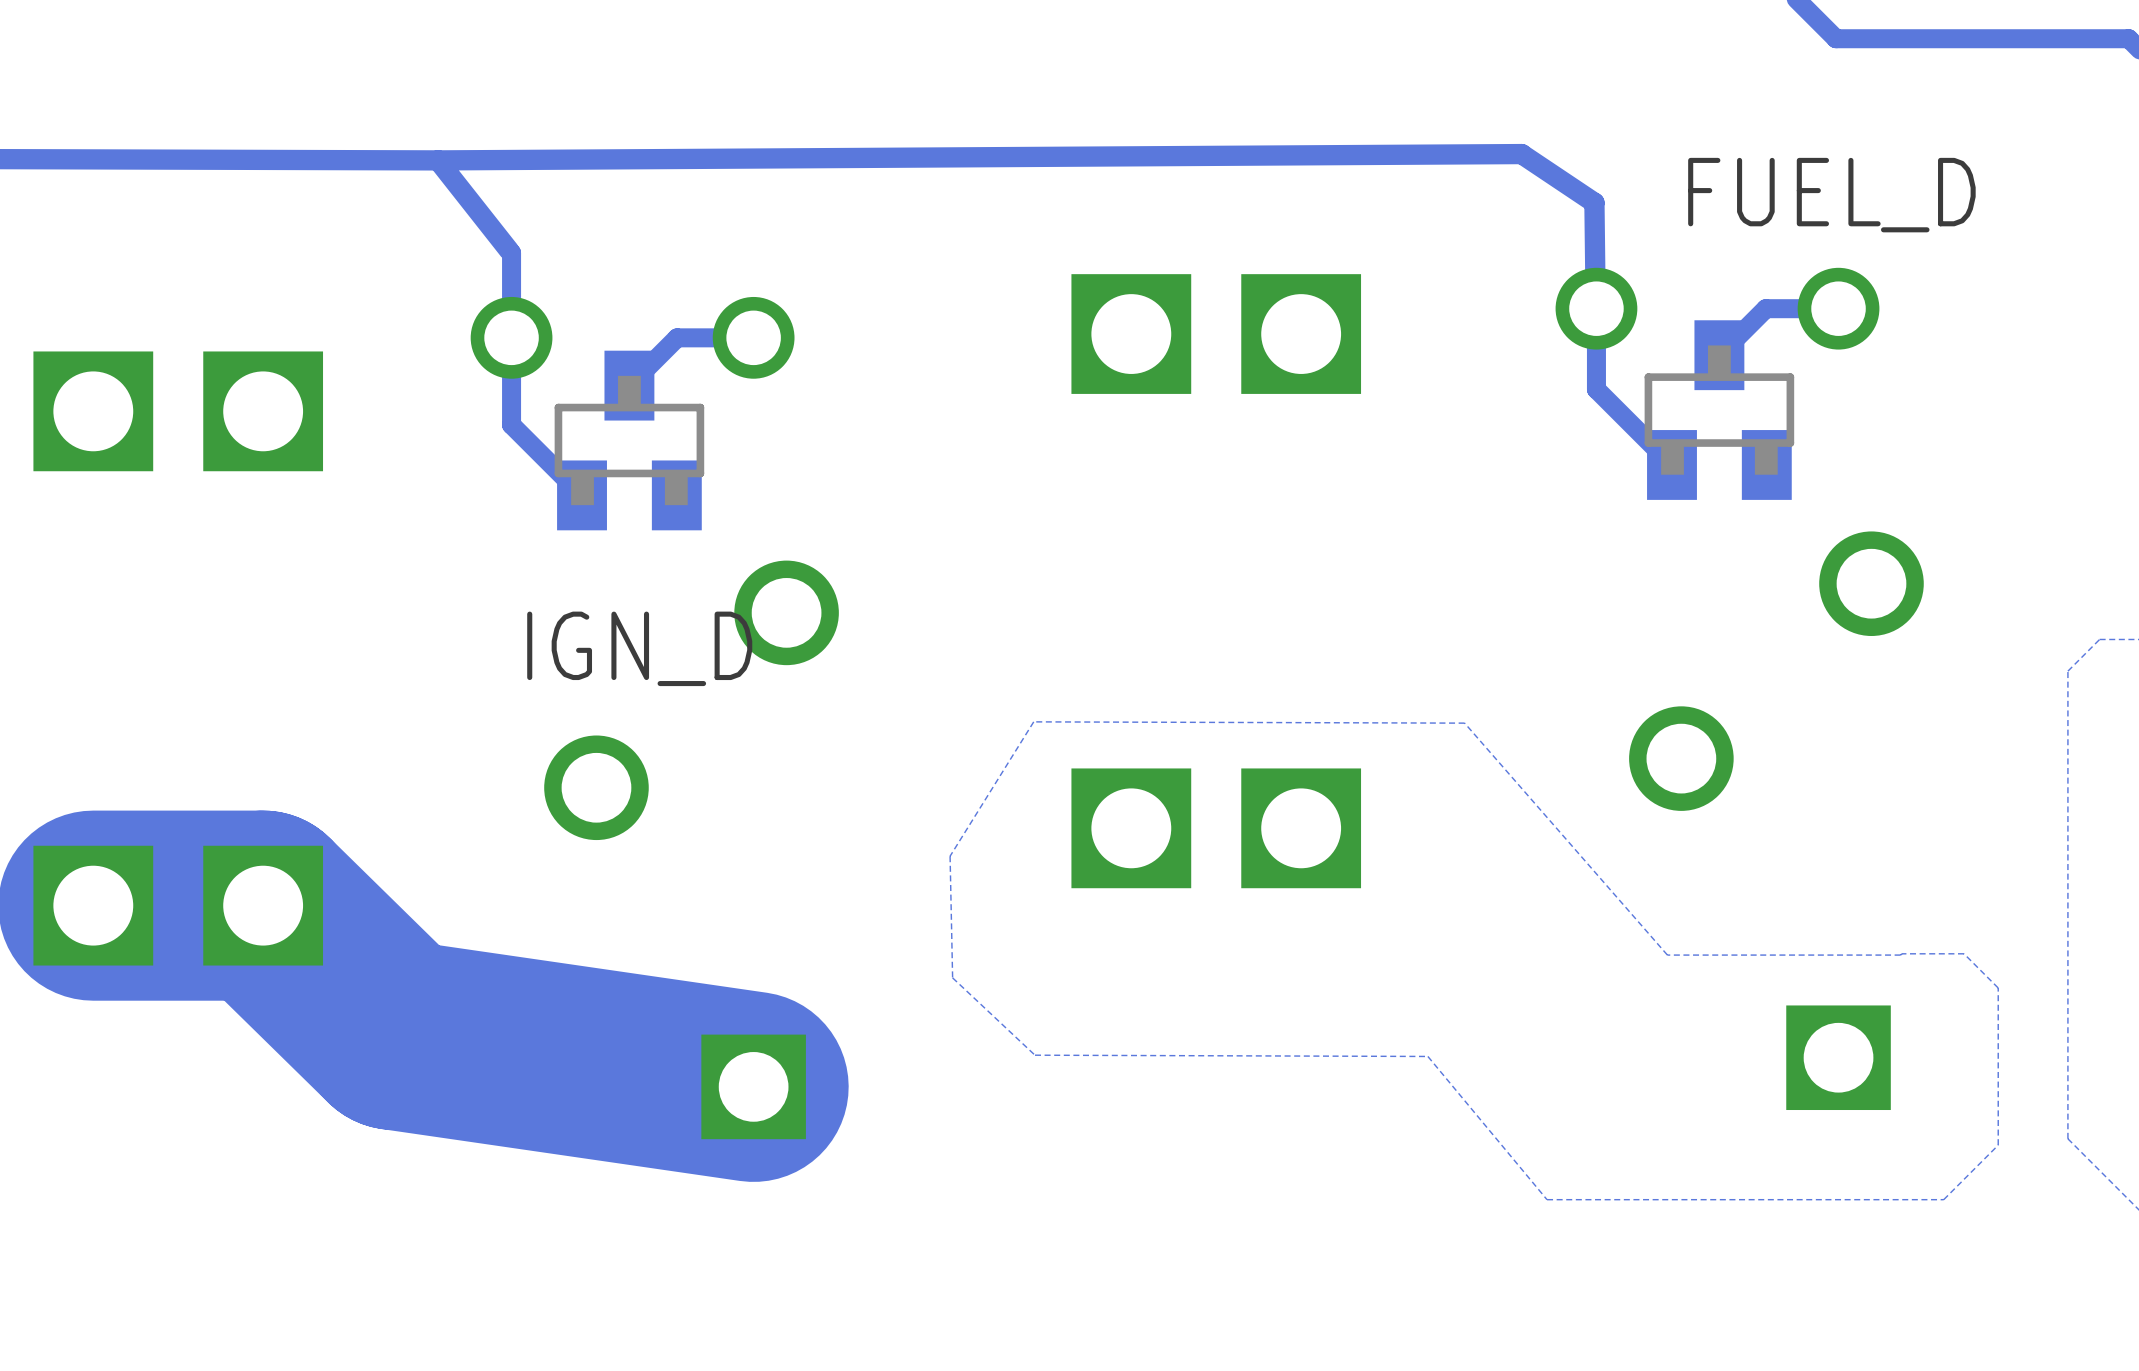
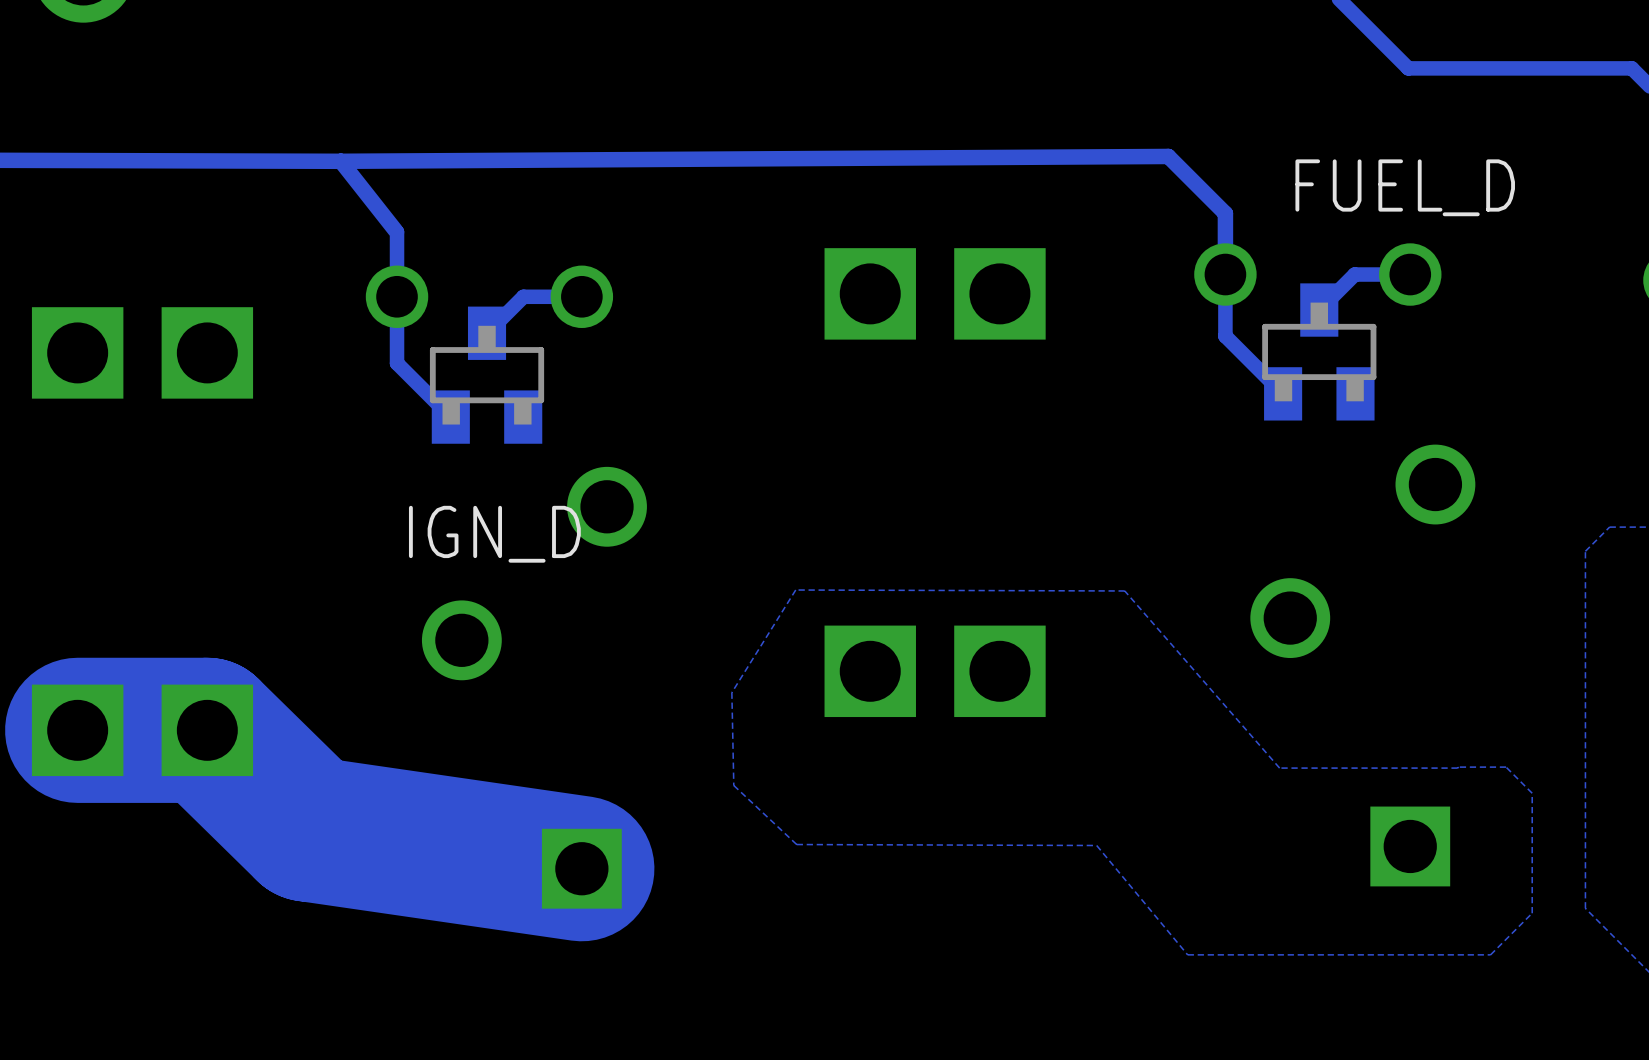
track: (1521, 154) (1594, 202) (1595, 307) -> (1168, 156) (1225, 213) (1225, 274)

